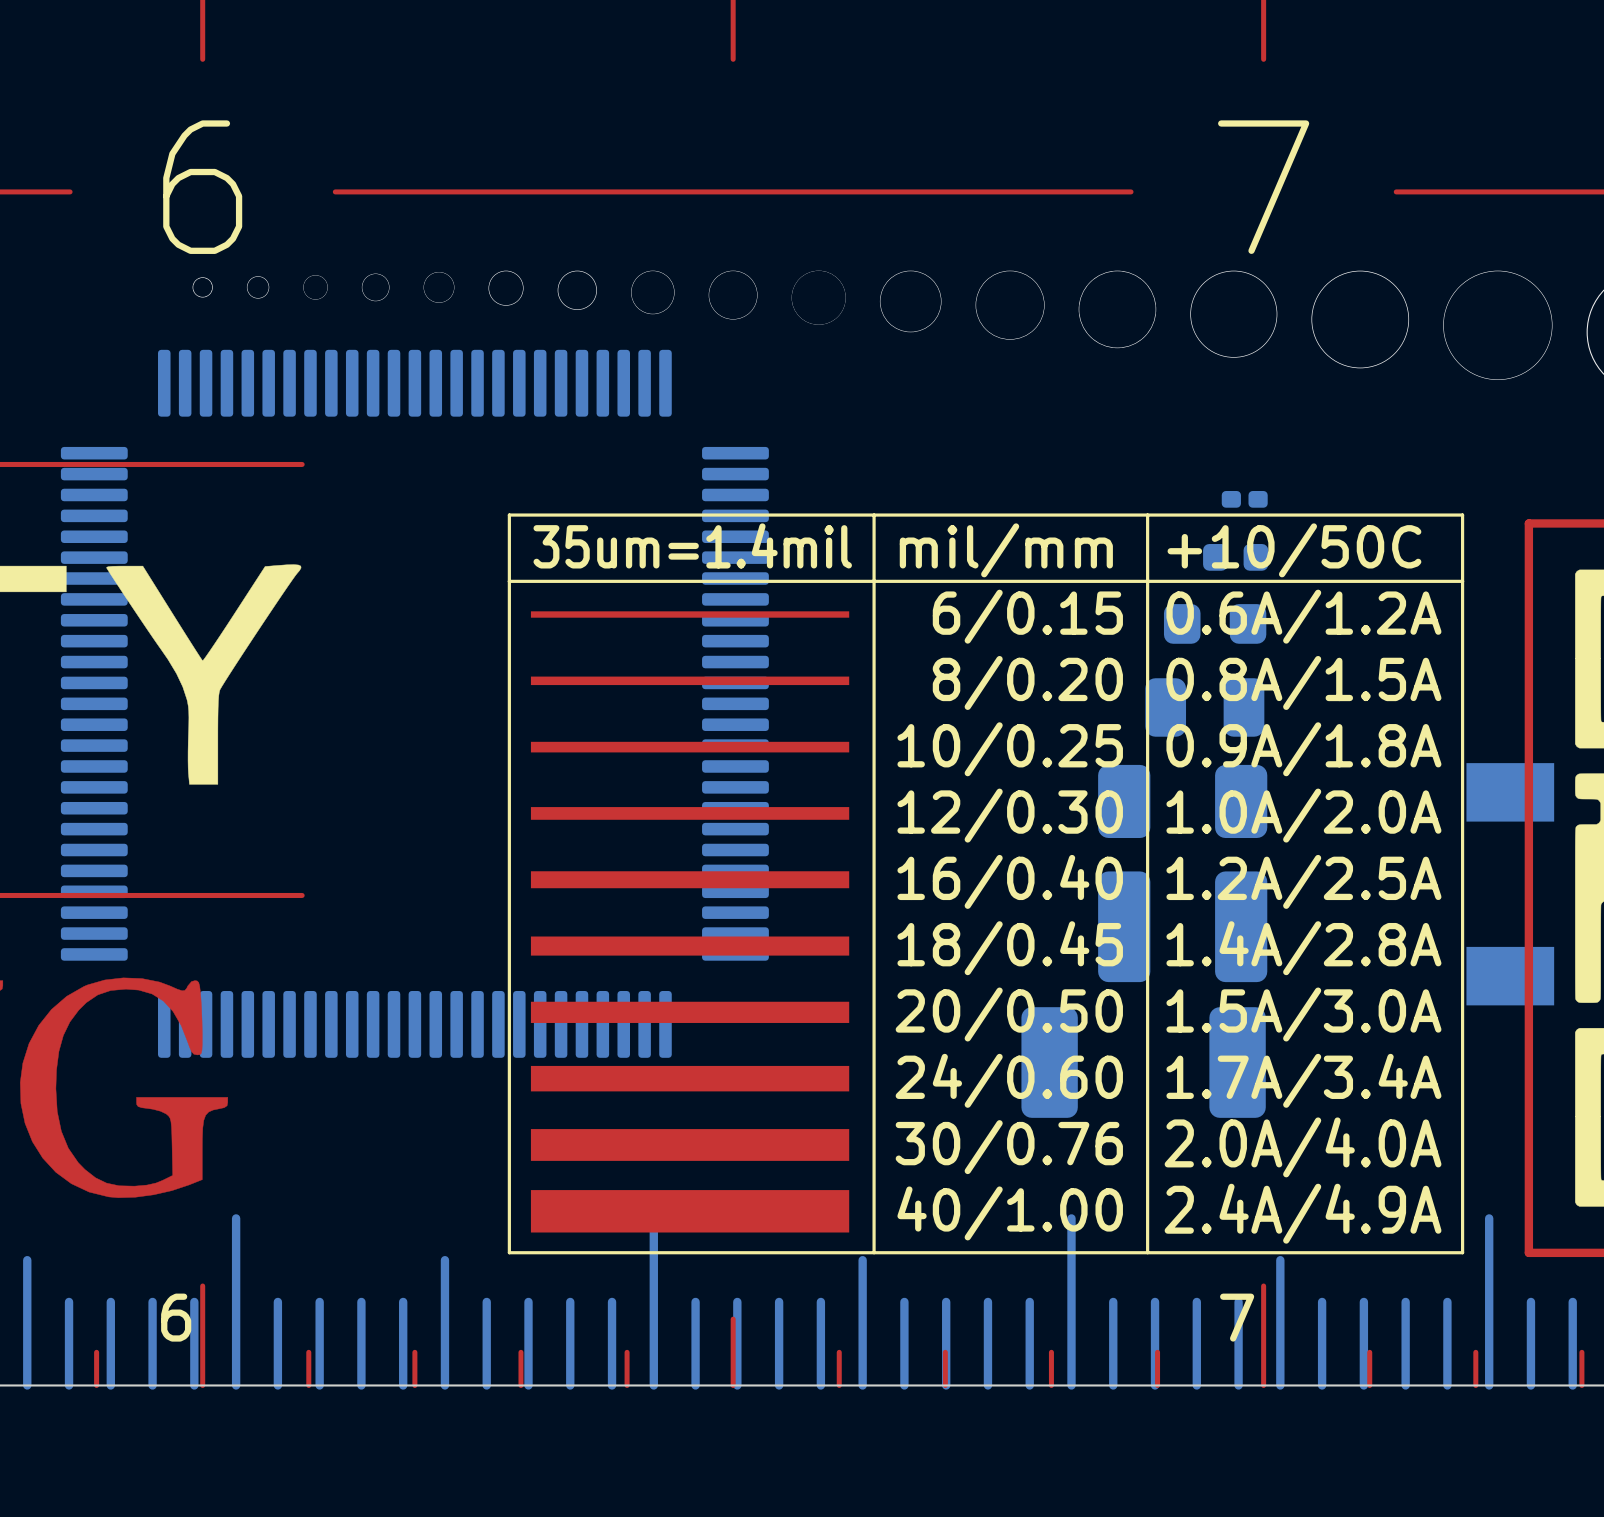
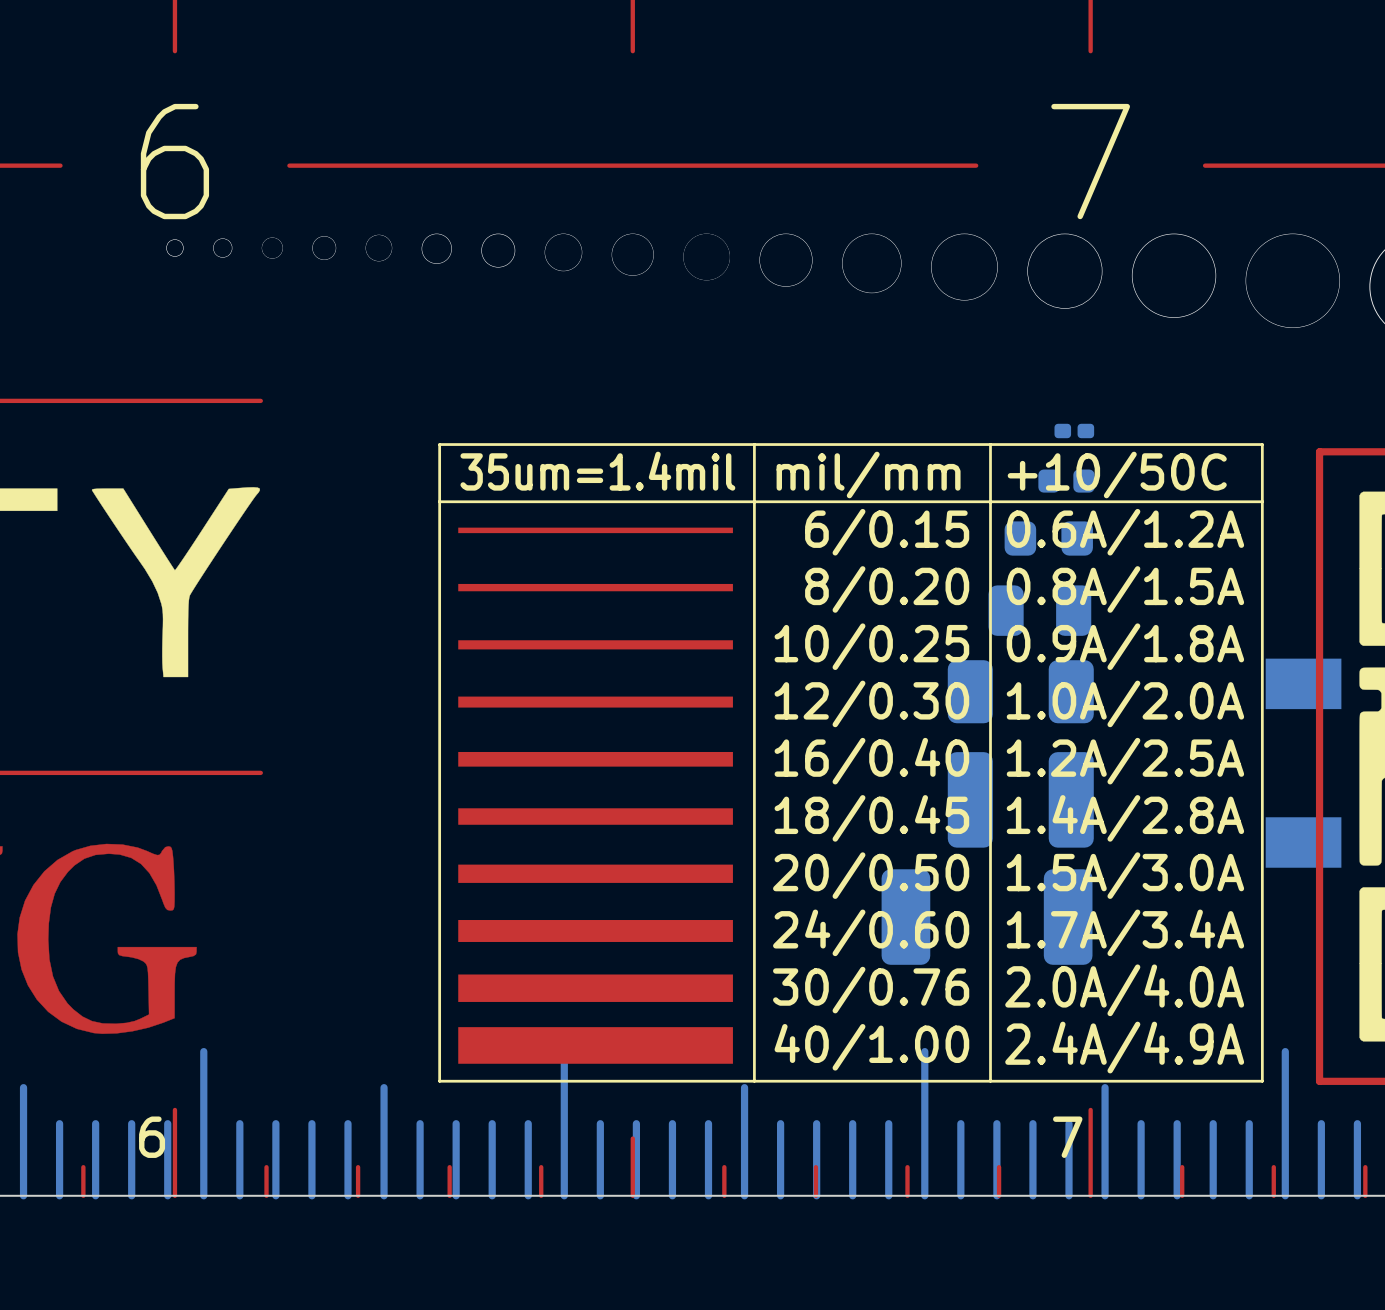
part: (414, 703) -> none

